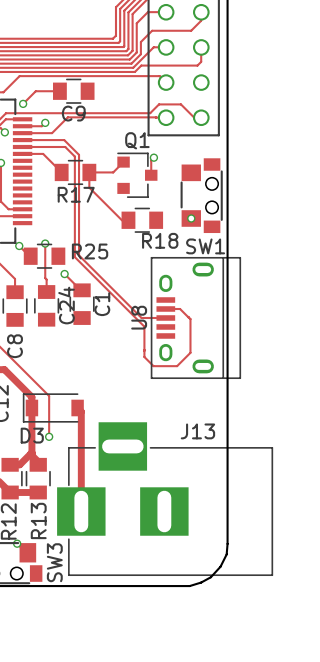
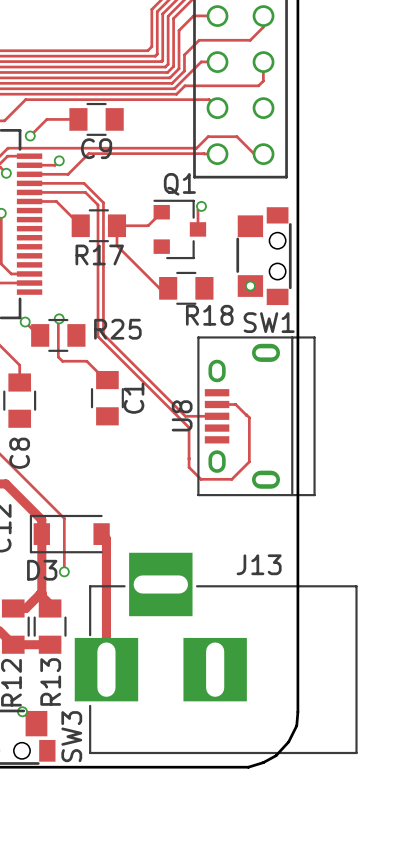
track: (45, 243) (46, 292) -> none
track: (64, 274) (80, 290) -> (58, 317) (58, 357) (62, 361) (86, 361) (105, 380)
via: (64, 274) -> none
C24: (46, 305) -> none

